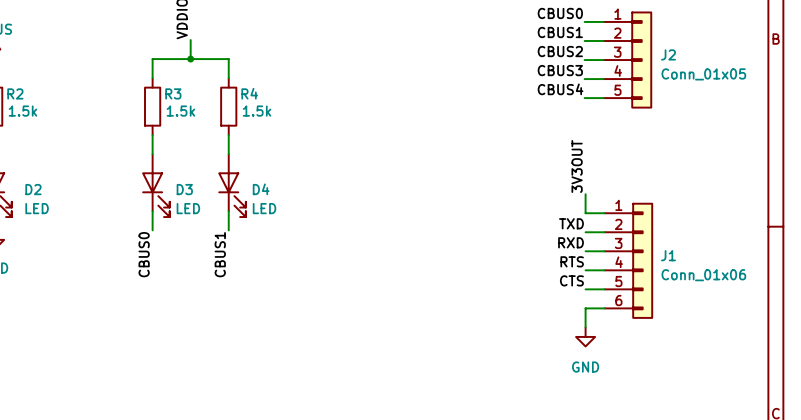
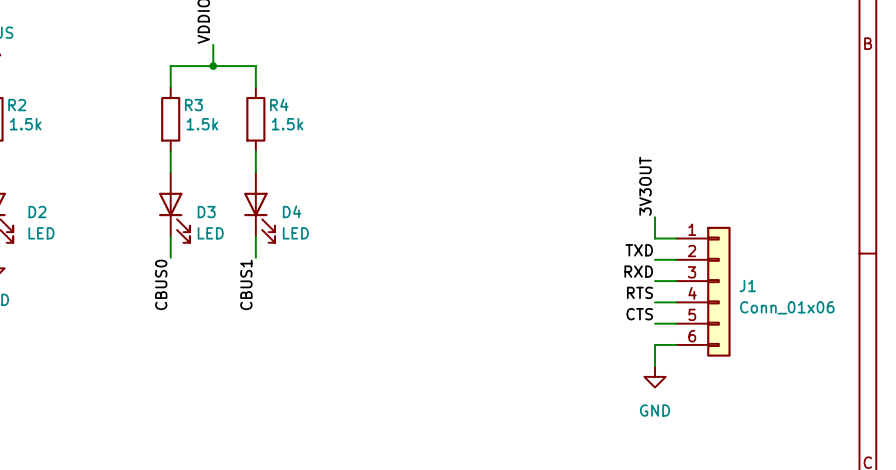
label: CBUS0 (560, 13) -> none
wire: (584, 21) (603, 21) -> none
label: CBUS1 (560, 32) -> none
wire: (584, 41) (603, 41) -> none
label: CBUS2 (560, 51) -> none
wire: (584, 60) (603, 60) -> none
J2: Conn_01x05 (627, 60) -> none
label: CBUS3 (560, 70) -> none
wire: (584, 79) (603, 79) -> none
label: CBUS4 (560, 89) -> none
wire: (584, 98) (603, 98) -> none

